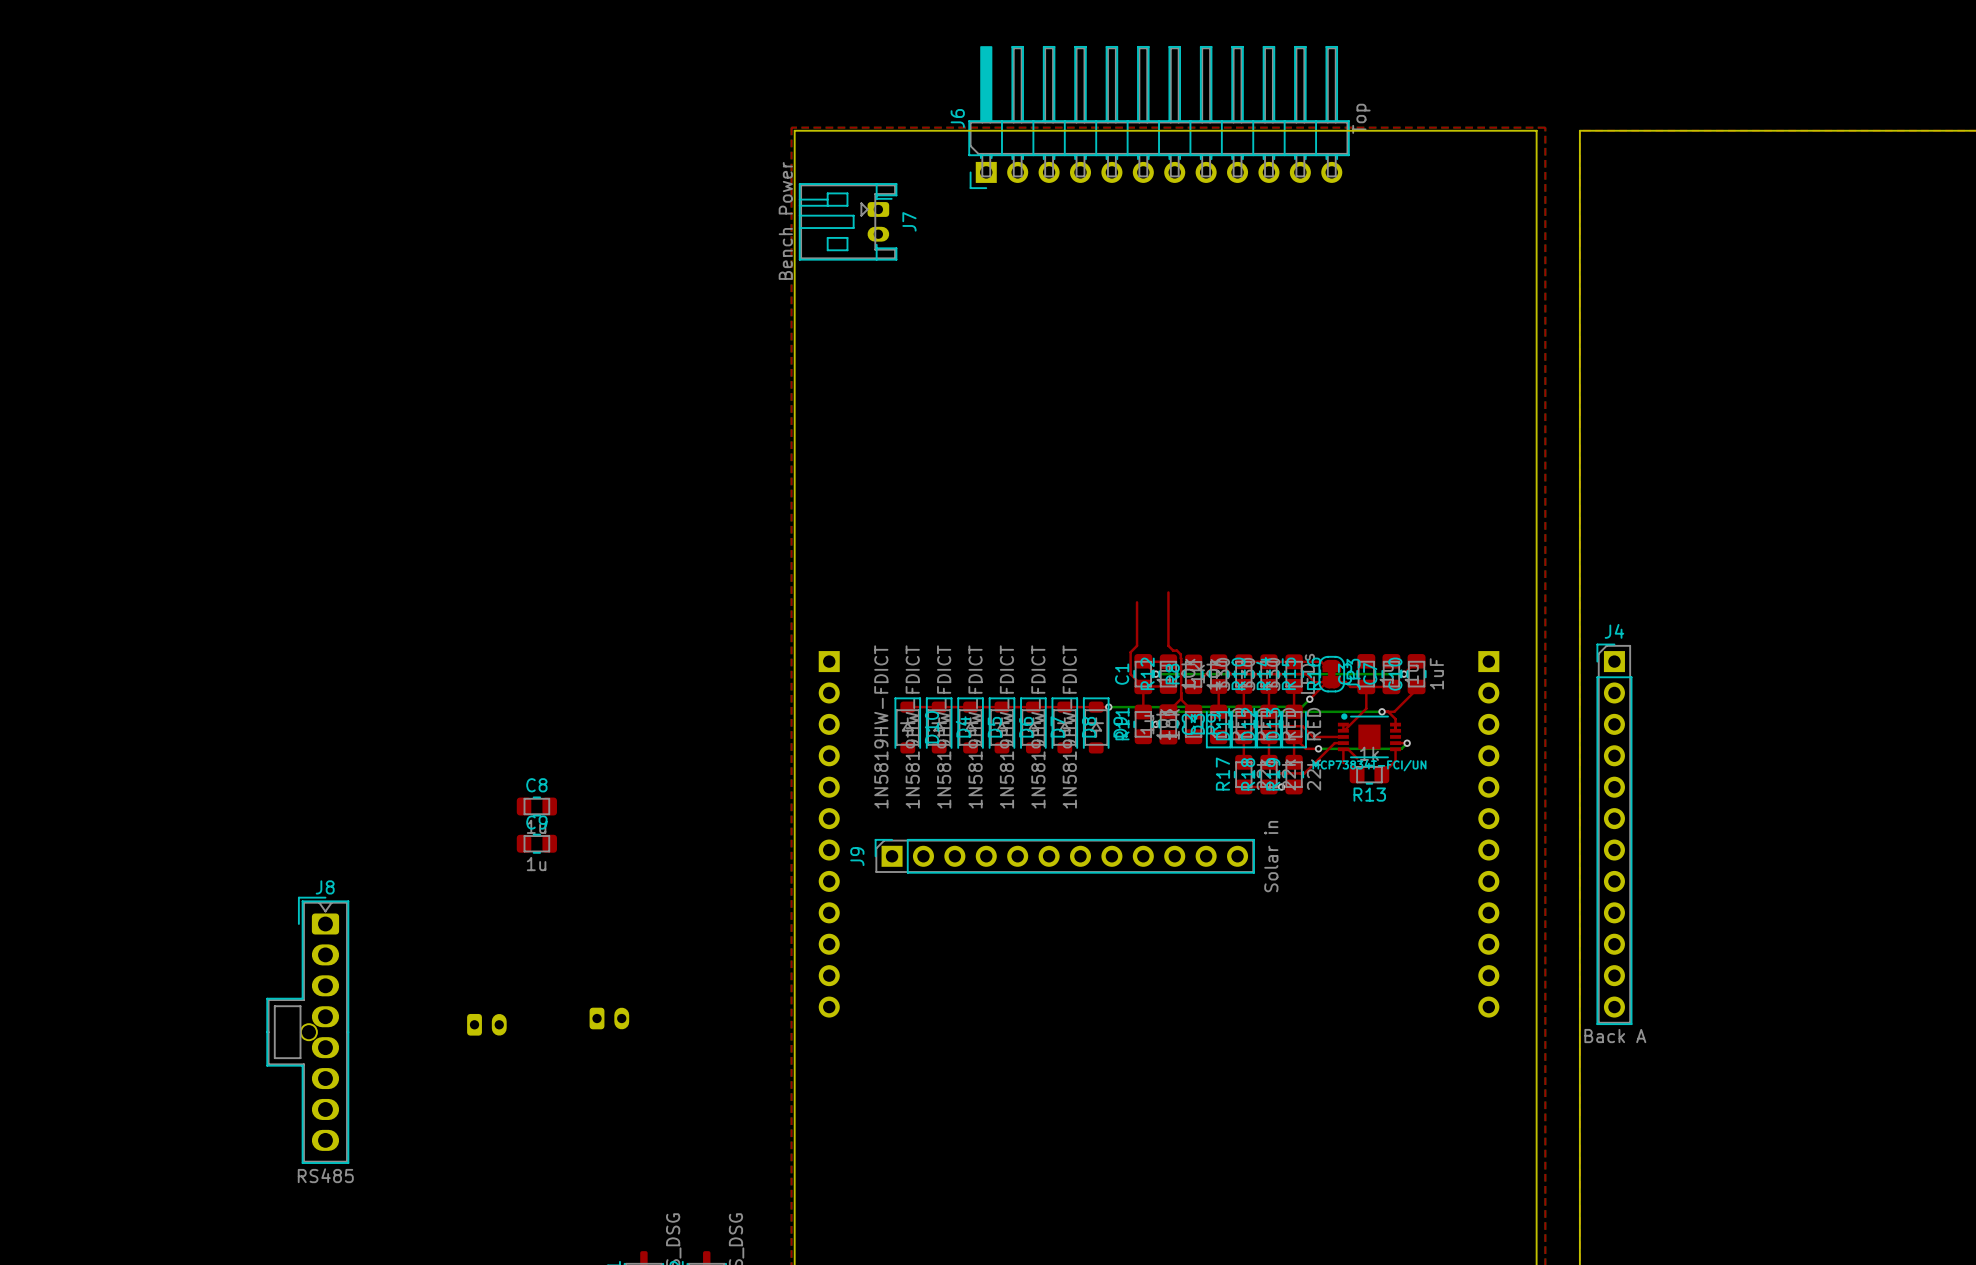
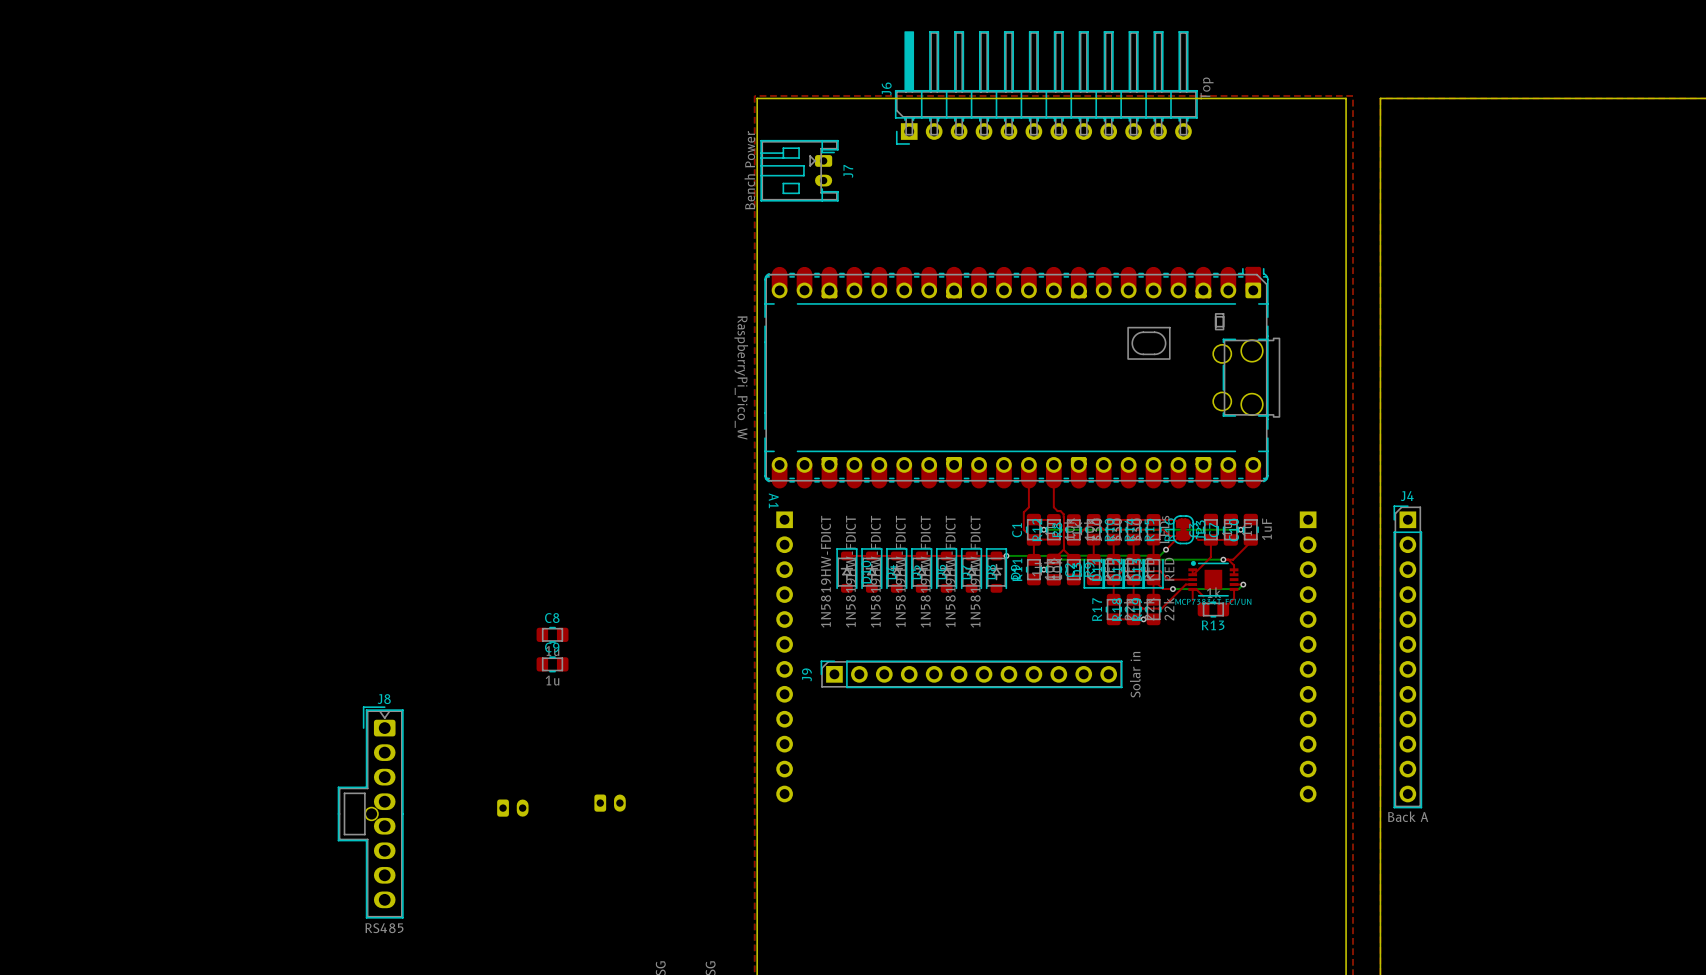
A1: none -> RaspberryPi_Pico_W (1022, 377)

